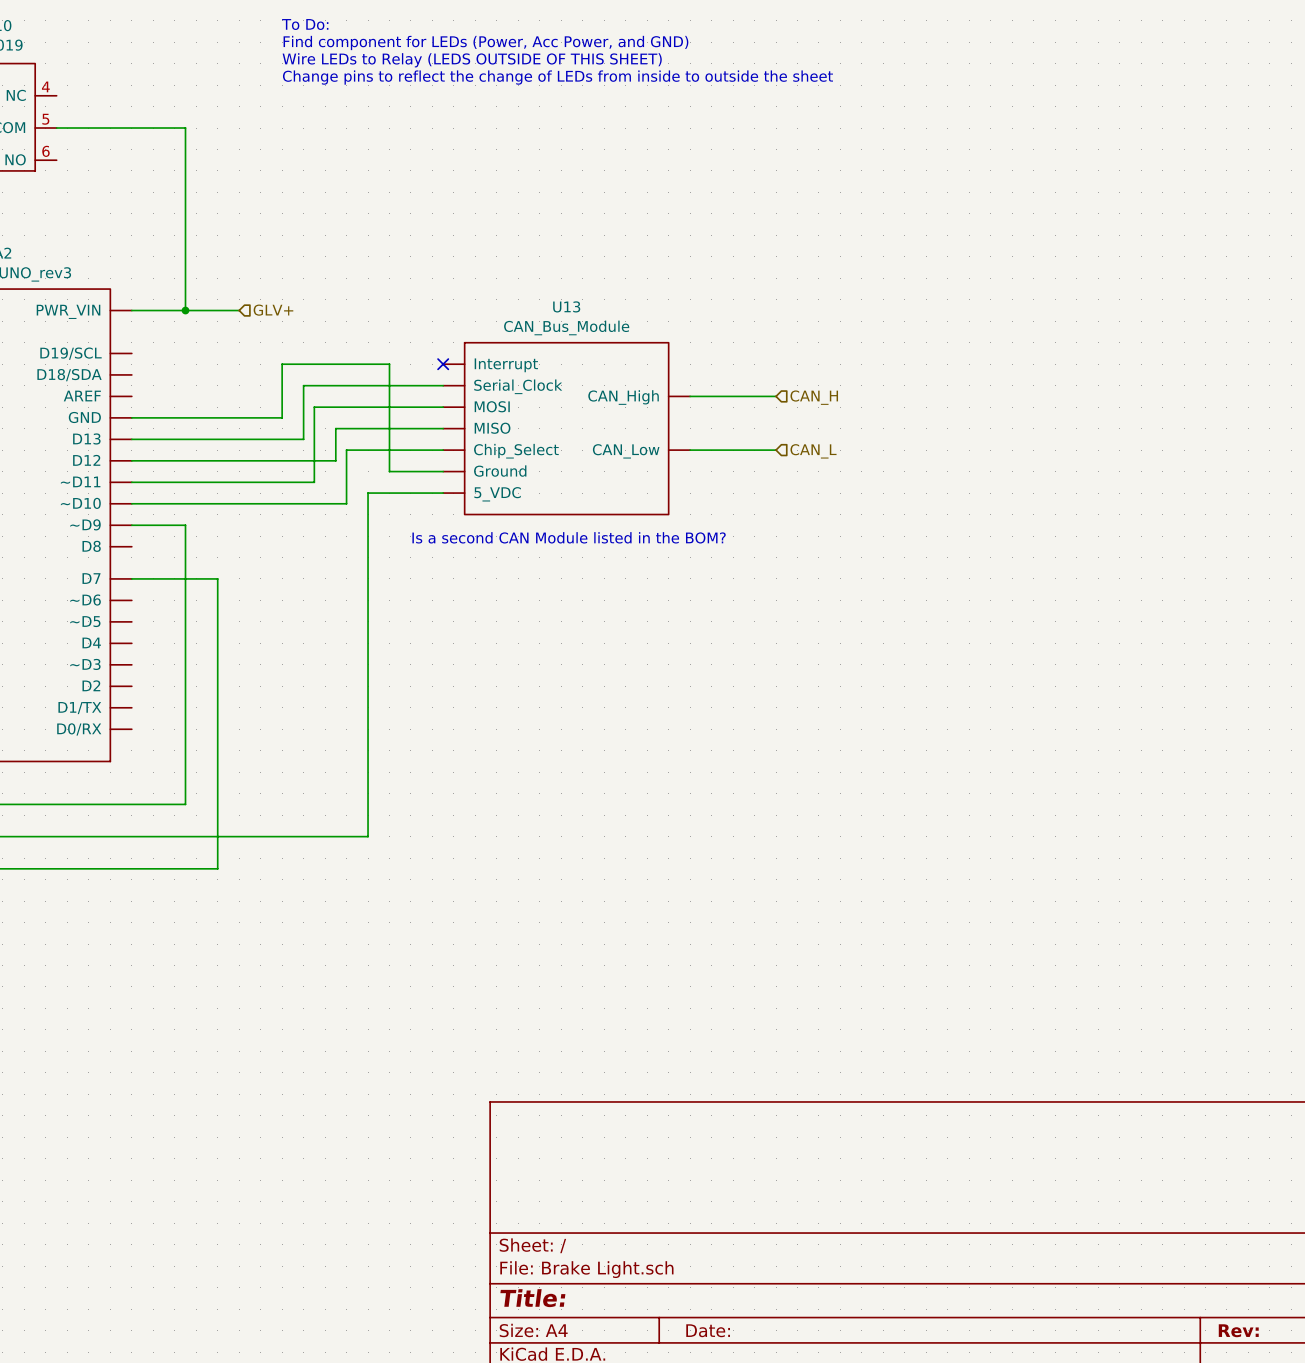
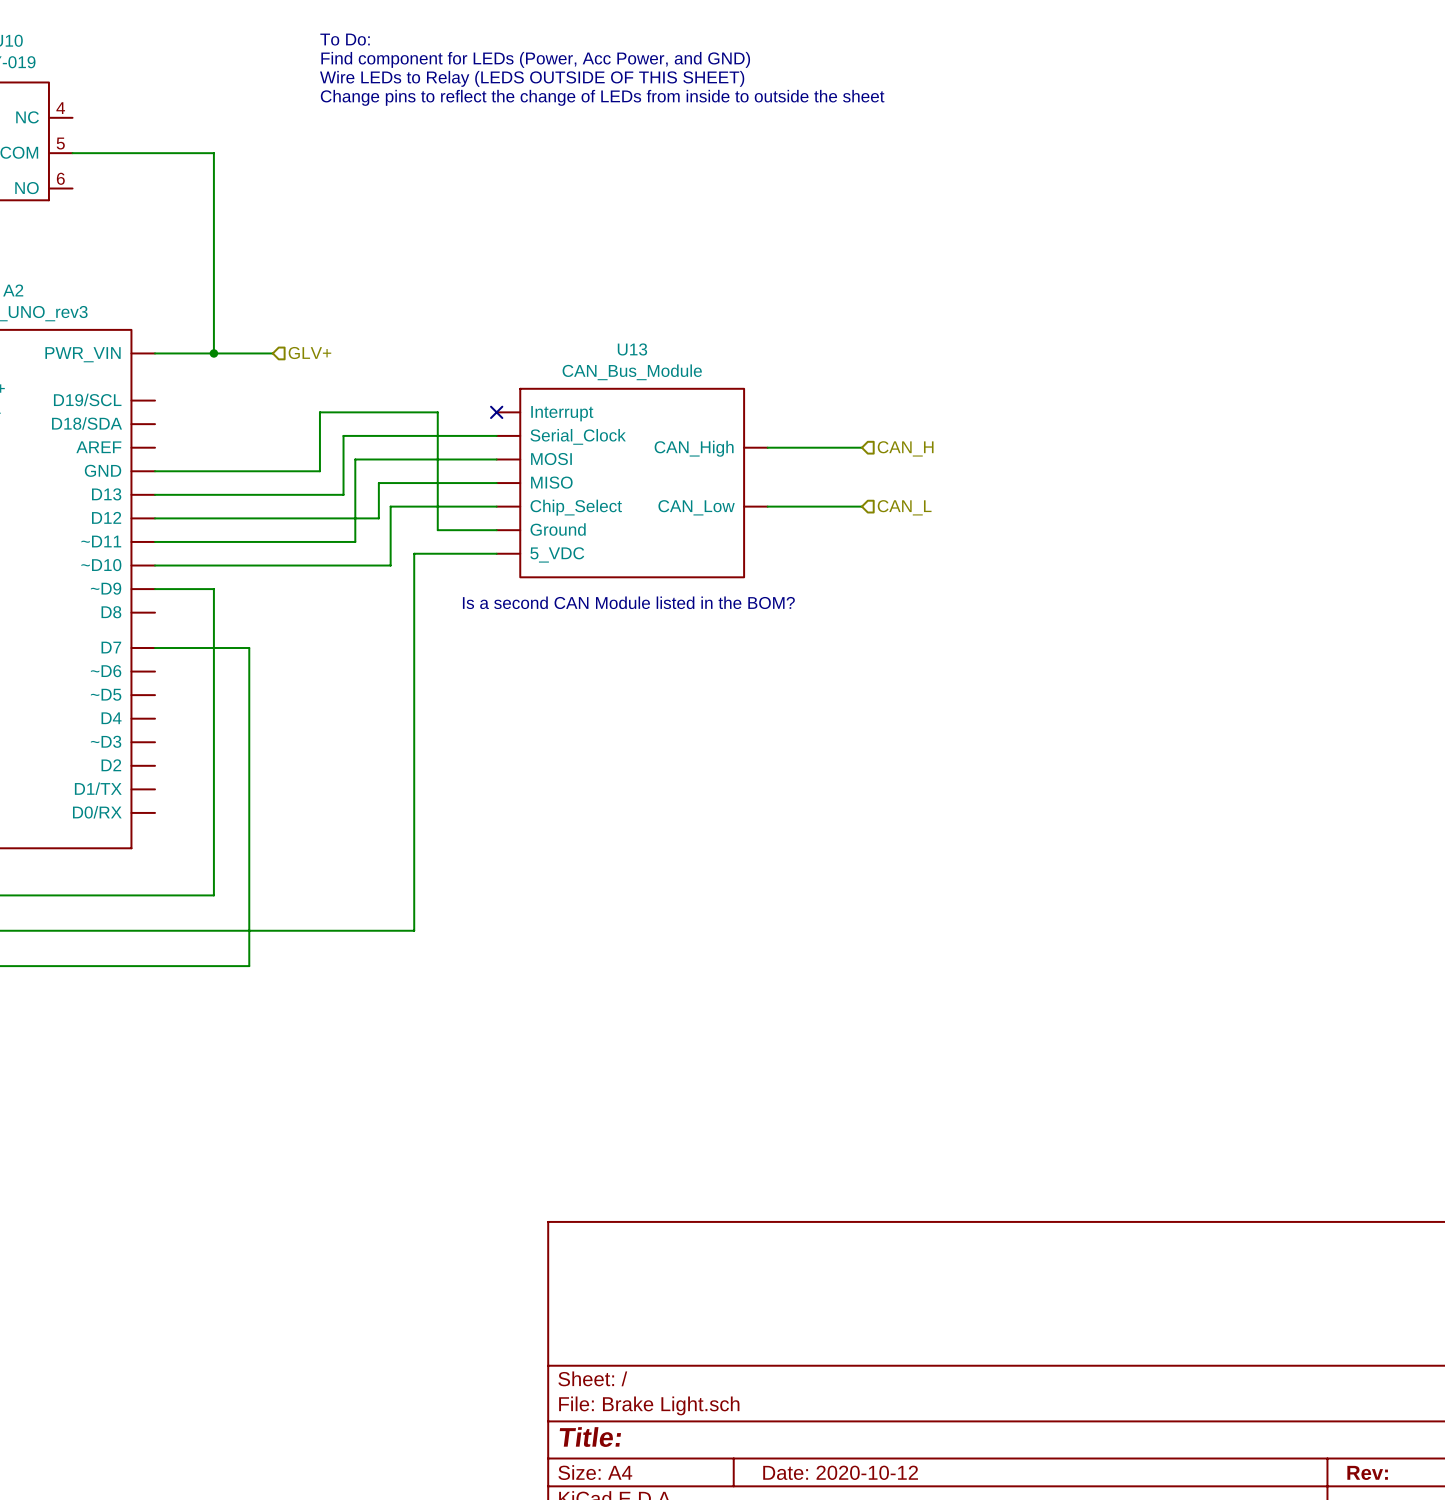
title block: Date: (708, 1330) -> Date: 2020-10-12 (840, 1472)

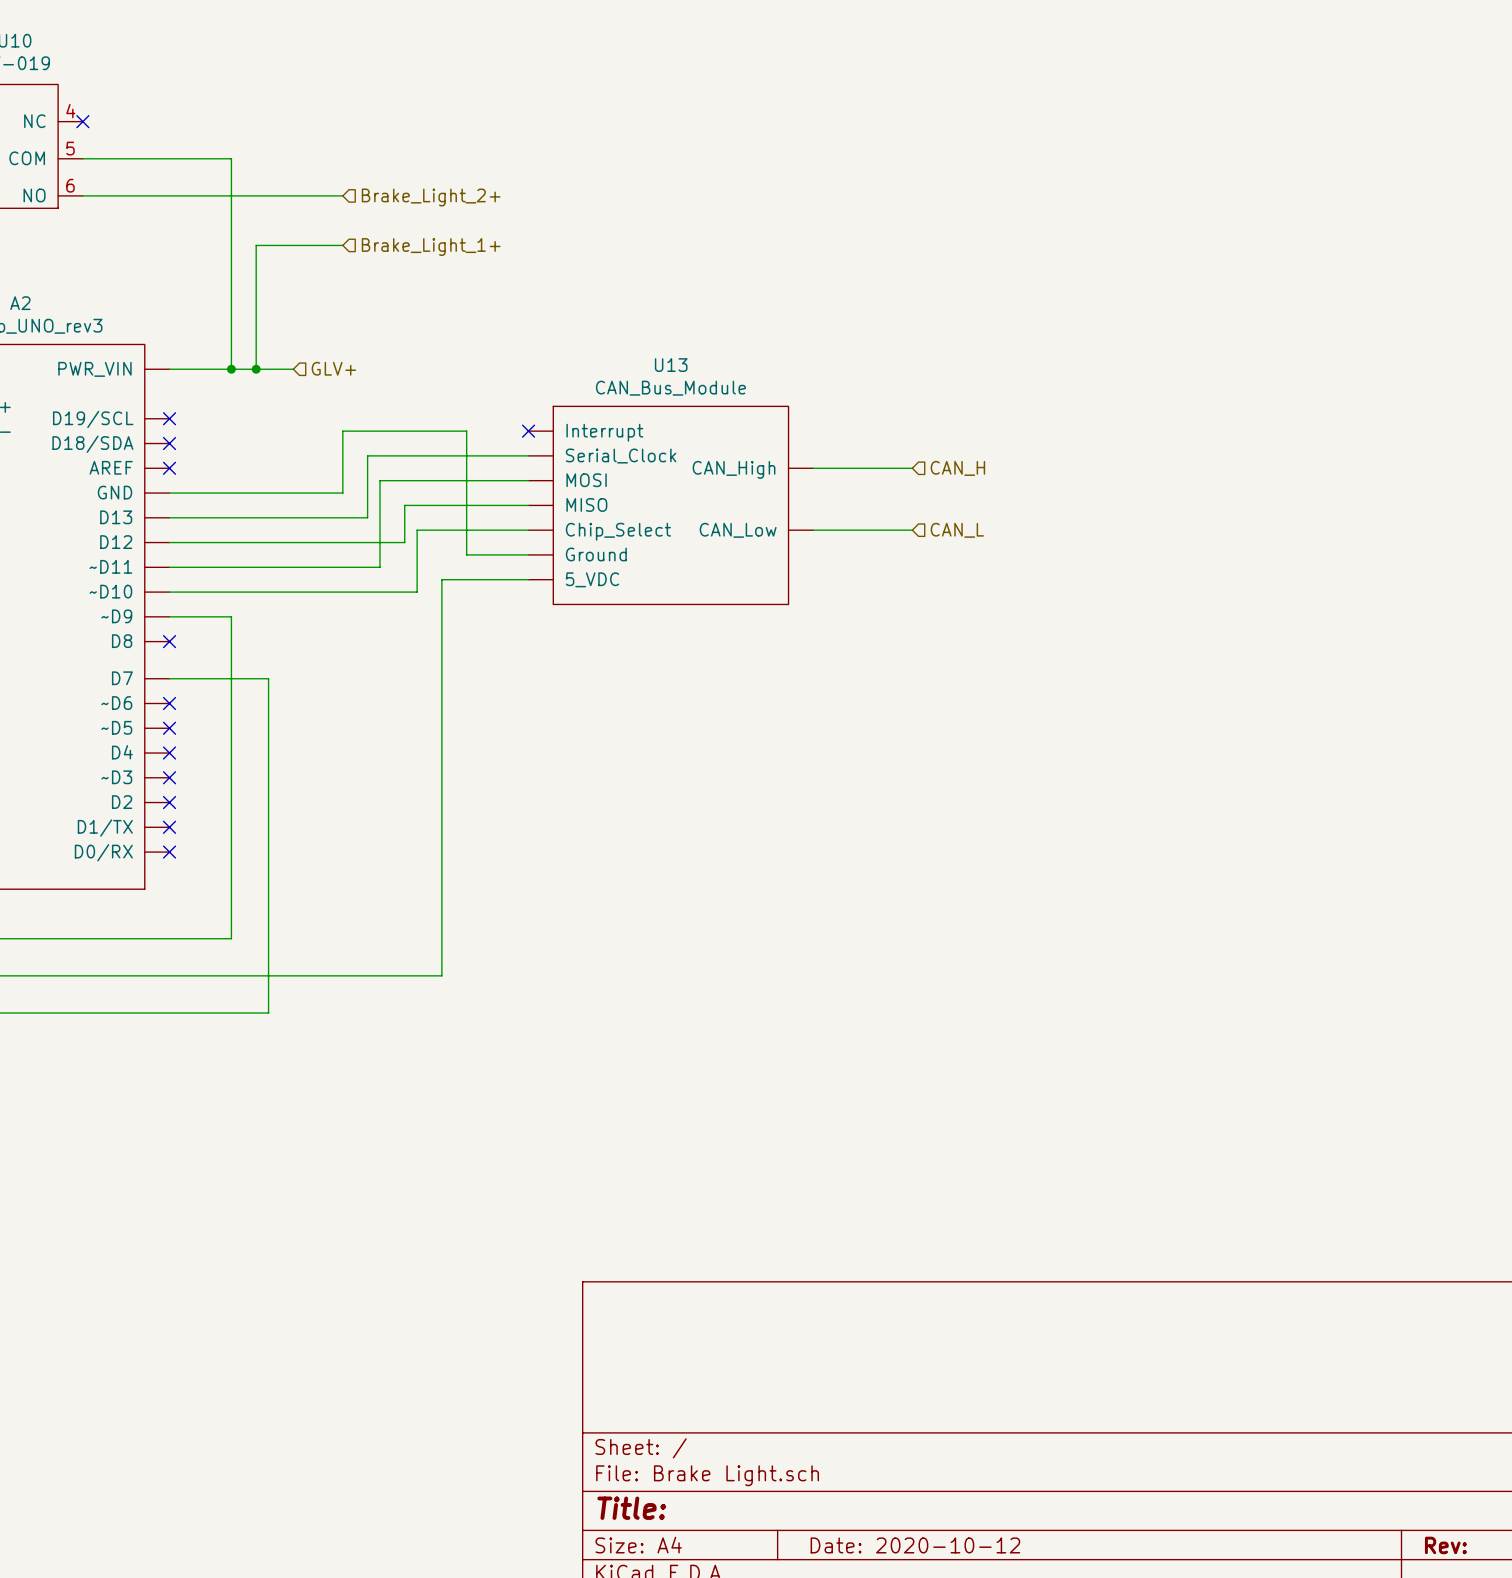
text: To Do: (345, 39) -> none
text: Find component for LEDs (Power, Acc Power, and GND) (535, 59) -> none
text: Wire LEDs to Relay (LEDS OUTSIDE OF THIS SHEET) (532, 78) -> none
text: Change pins to reflect the change of LEDs from inside to outside the sheet (602, 97) -> none
no-connect mark: none -> (82, 121)
wire: none -> (82, 195) (342, 195)
hierarchical label: none -> Brake_Light_2+ (431, 197)
wire: none -> (342, 245) (256, 245) (256, 369)
hierarchical label: none -> Brake_Light_1+ (431, 247)
junction: none -> (256, 369)
no-connect mark: none -> (169, 418)
no-connect mark: none -> (169, 443)
no-connect mark: none -> (169, 468)
text: Is a second CAN Module listed in the BOM? (628, 602) -> none
no-connect mark: none -> (169, 641)
no-connect mark: none -> (169, 703)
no-connect mark: none -> (169, 728)
no-connect mark: none -> (169, 753)
no-connect mark: none -> (169, 777)
no-connect mark: none -> (169, 802)
no-connect mark: none -> (169, 827)
no-connect mark: none -> (169, 852)

